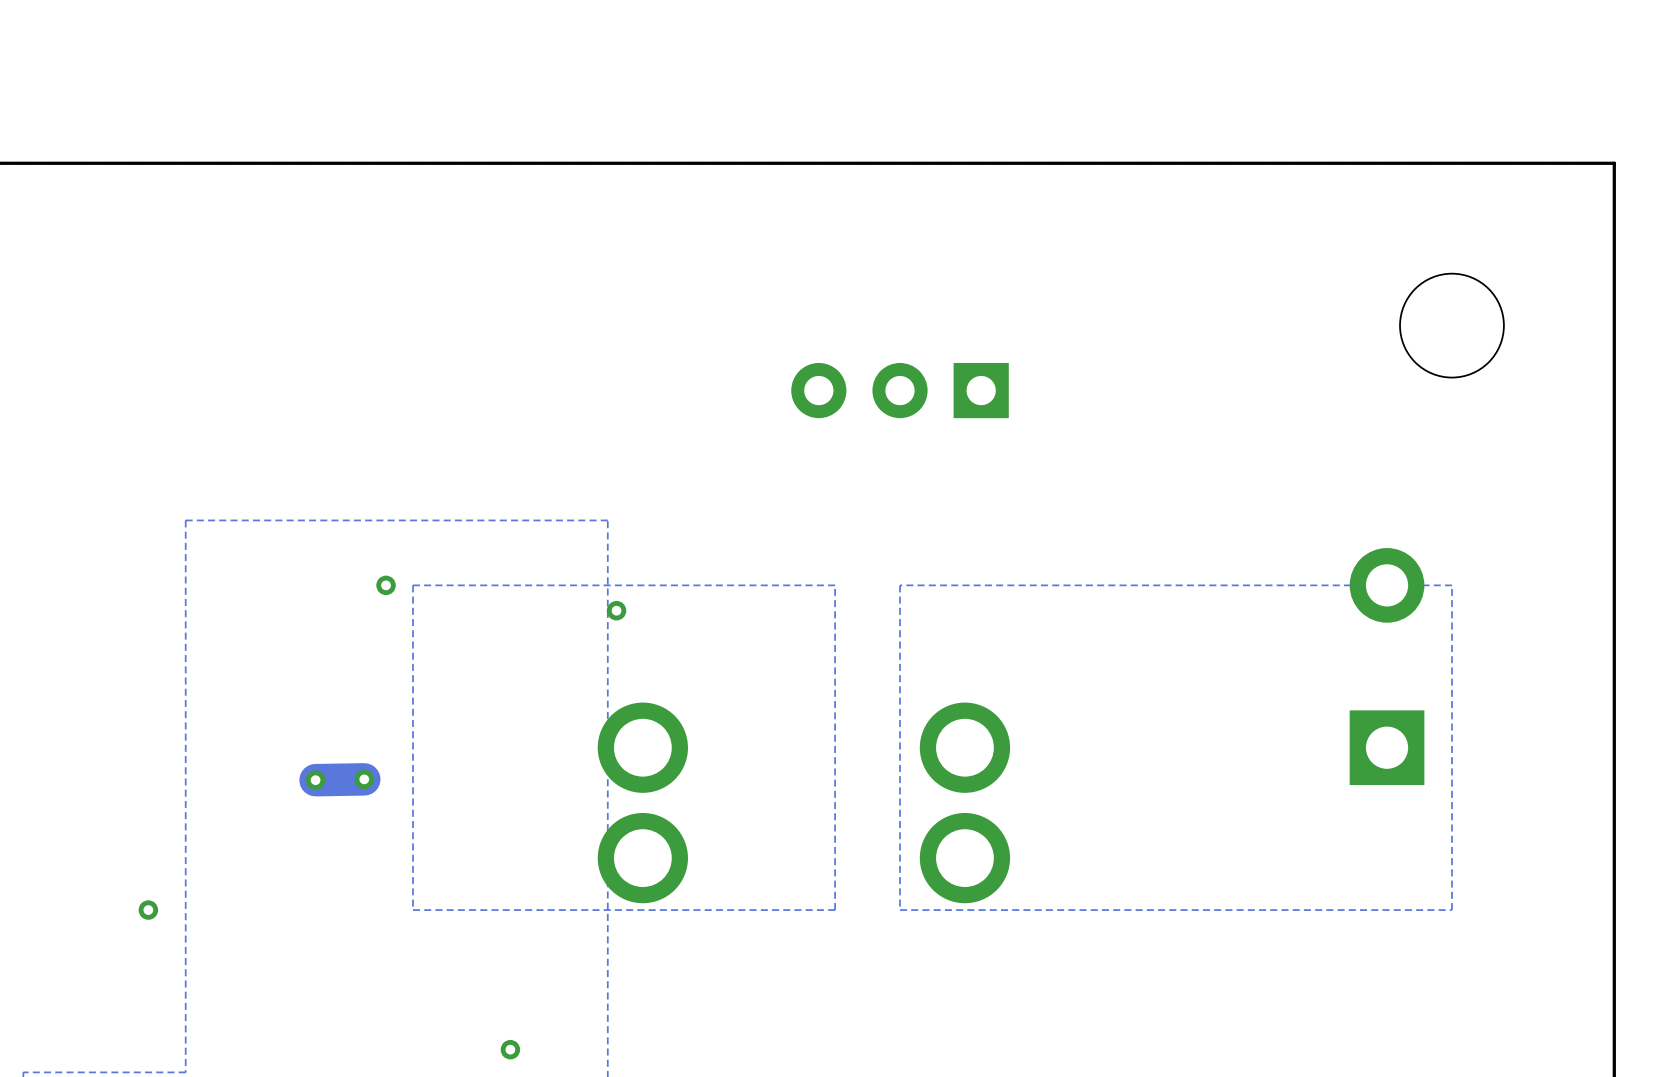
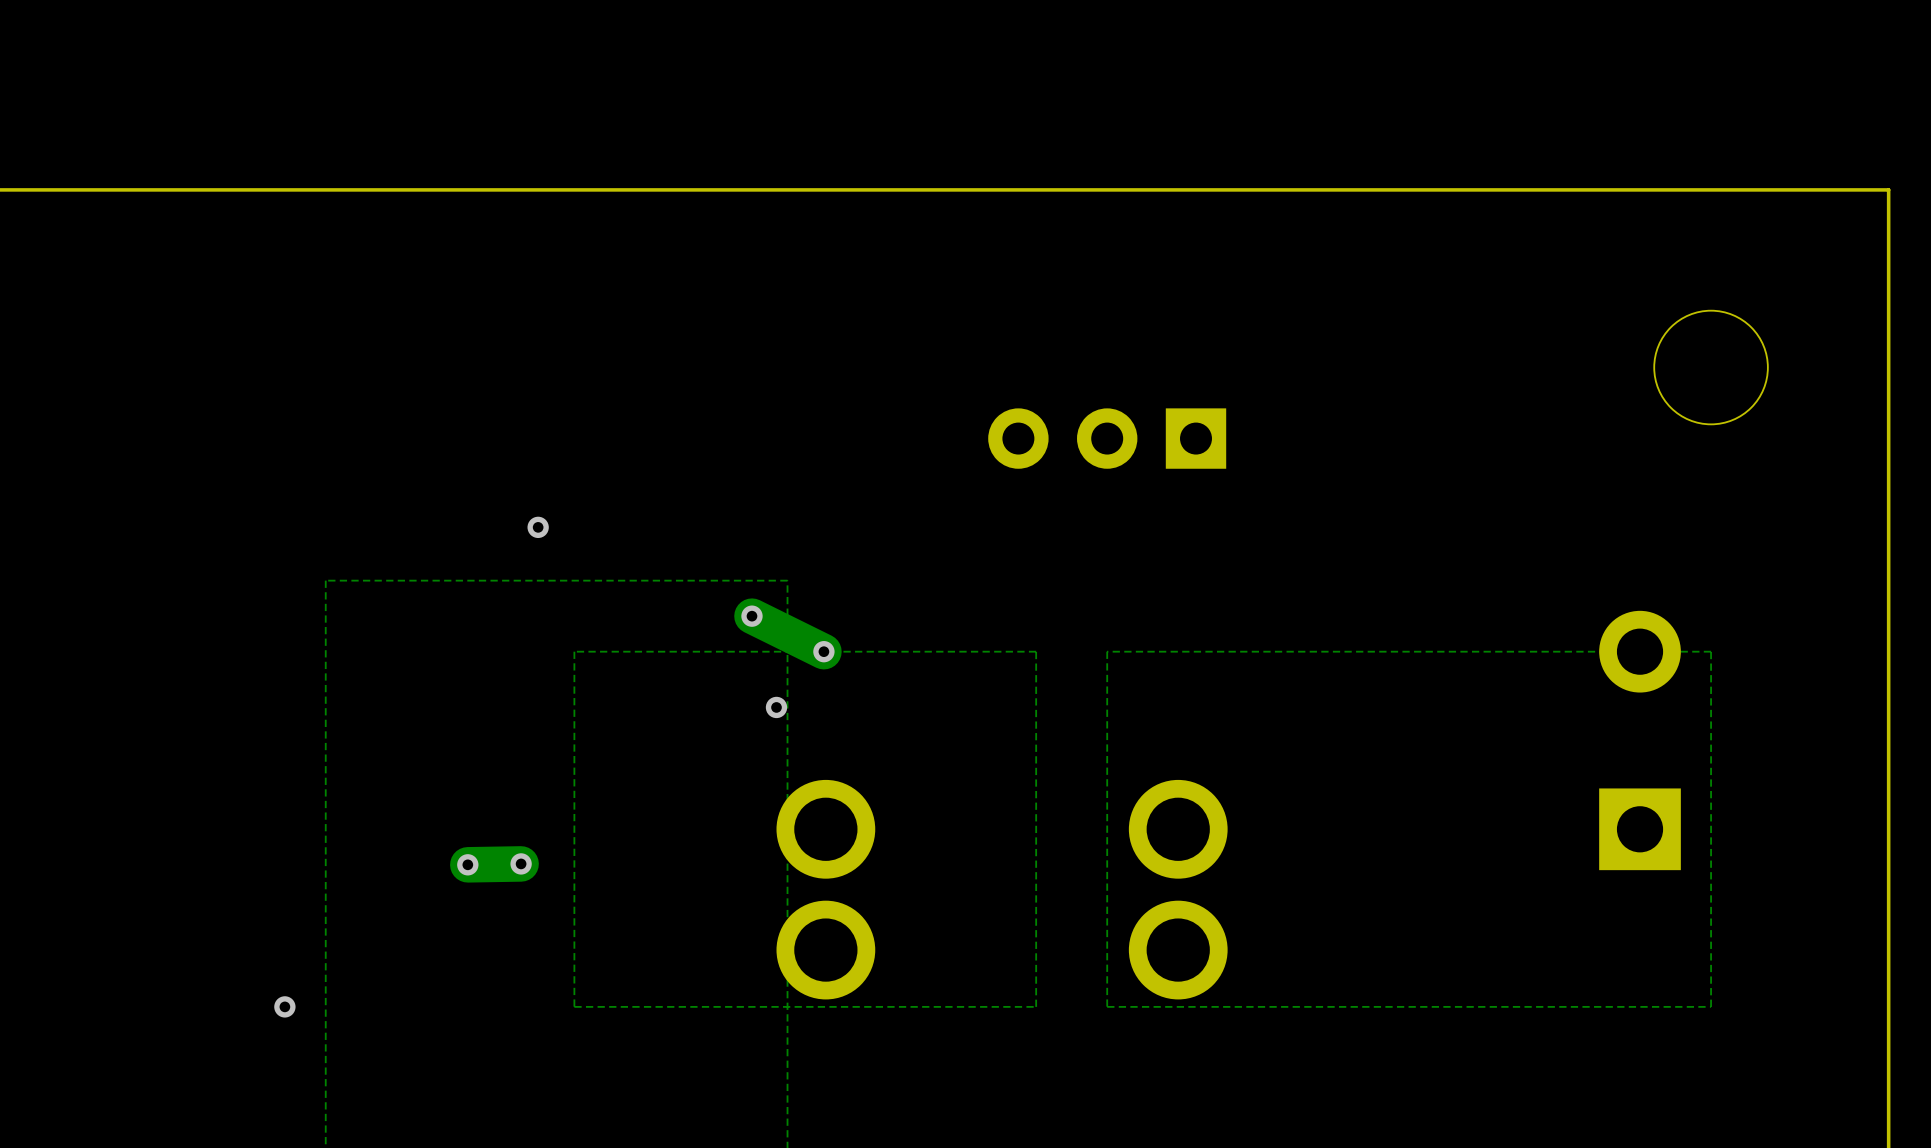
via: none -> (538, 527)
track: none -> (751, 616) (823, 651)
via: none -> (751, 616)
via: (386, 585) -> none
via: none -> (823, 651)
via: (616, 610) -> none
via: none -> (776, 707)

